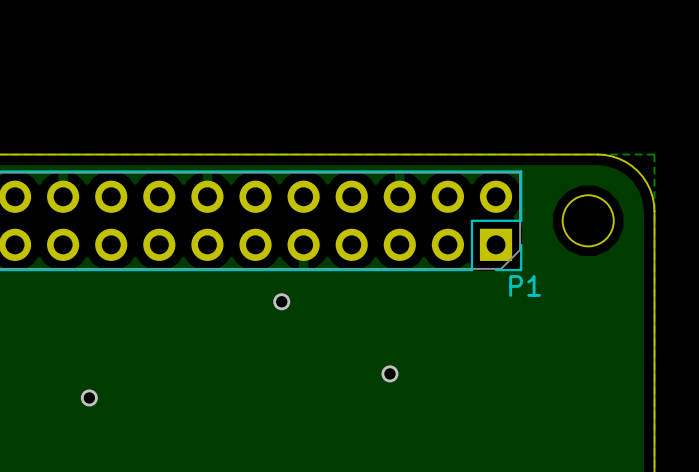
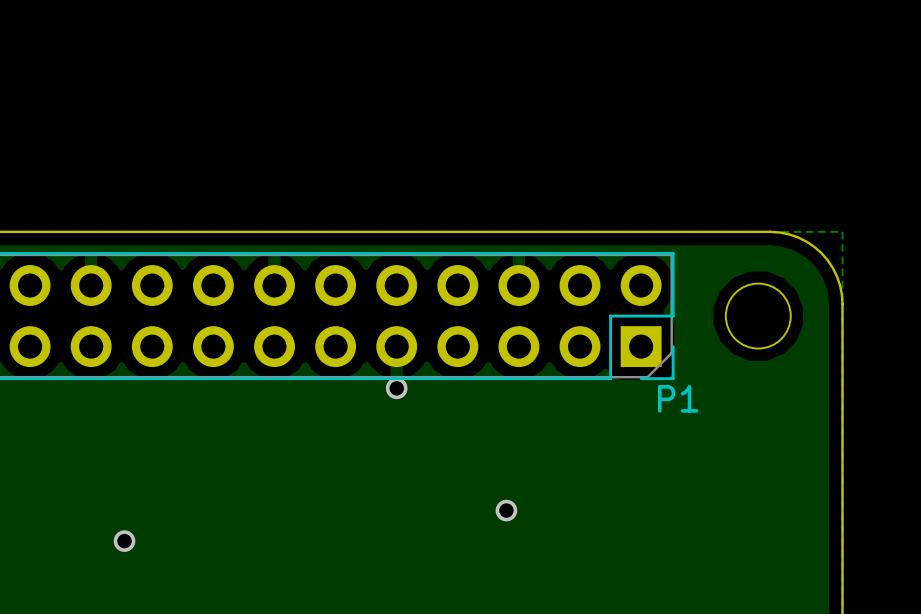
via position: (281, 301) -> (396, 388)

